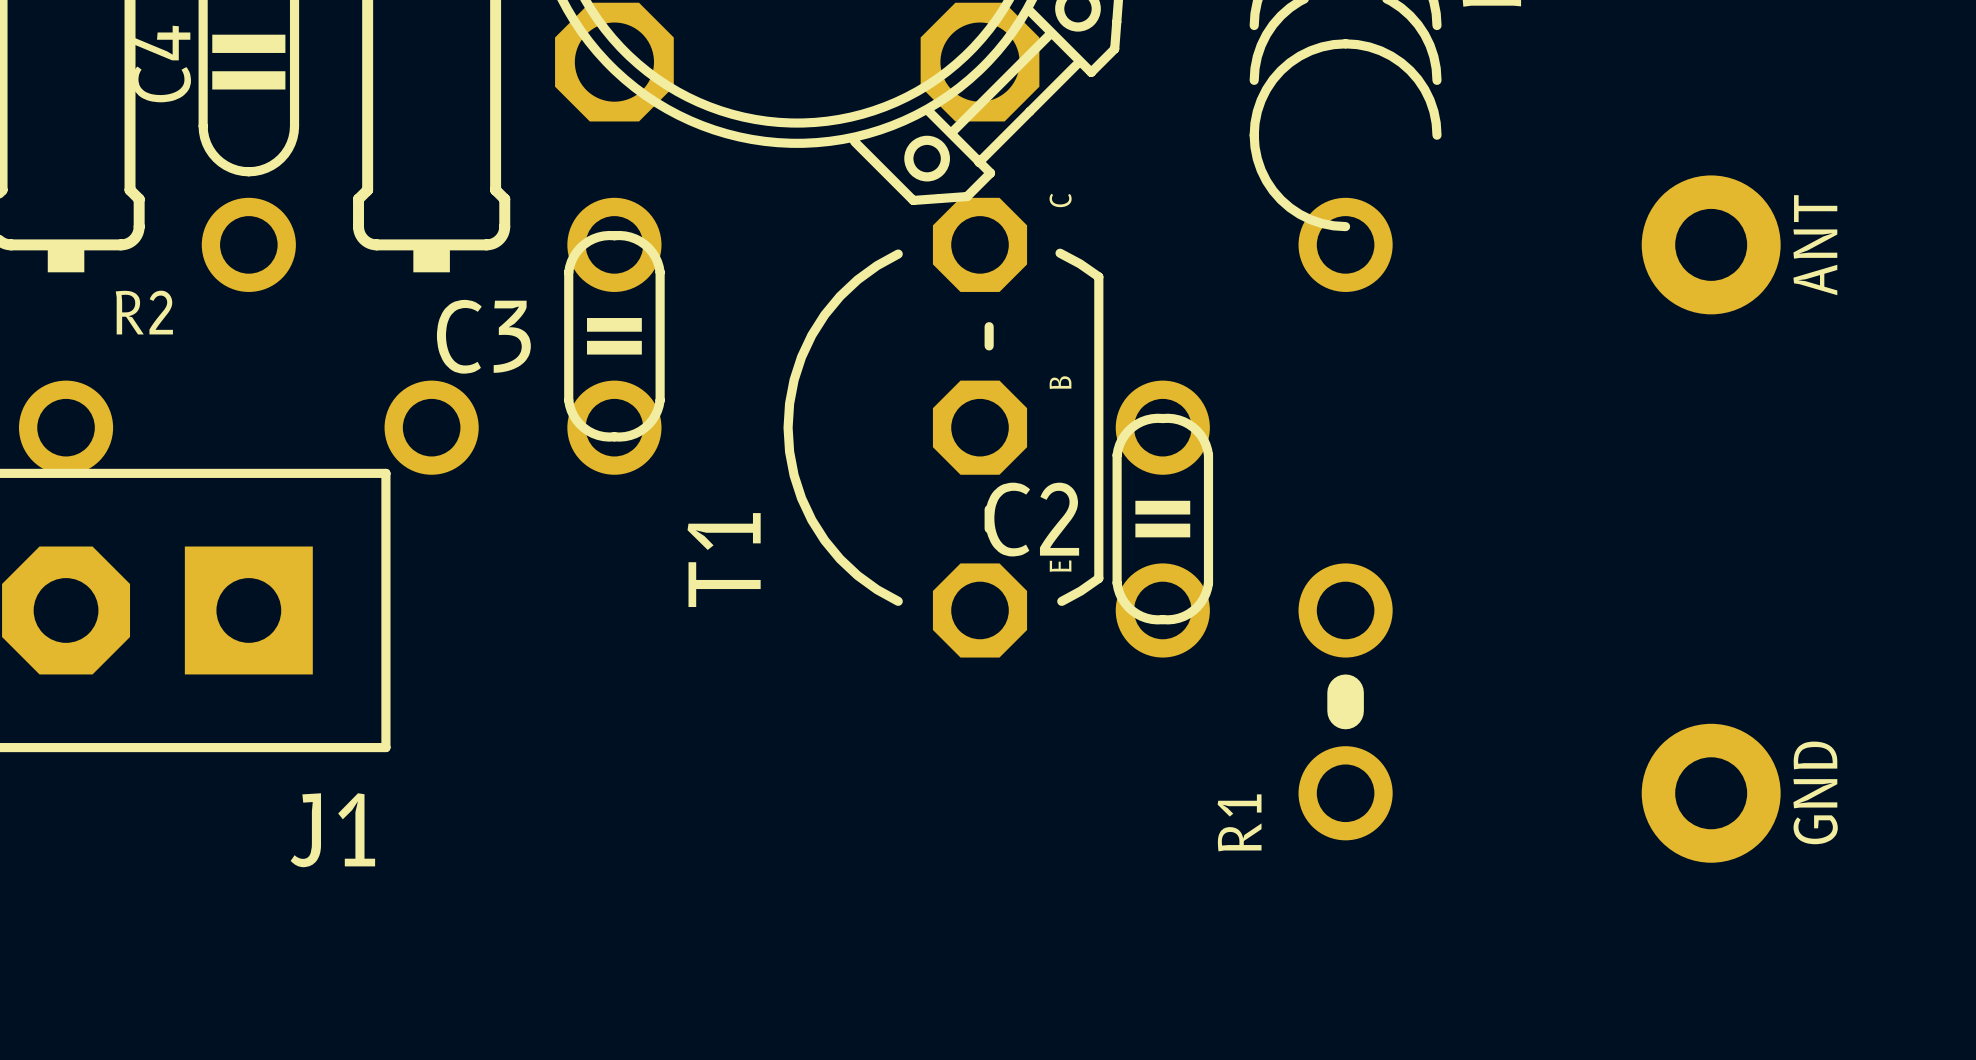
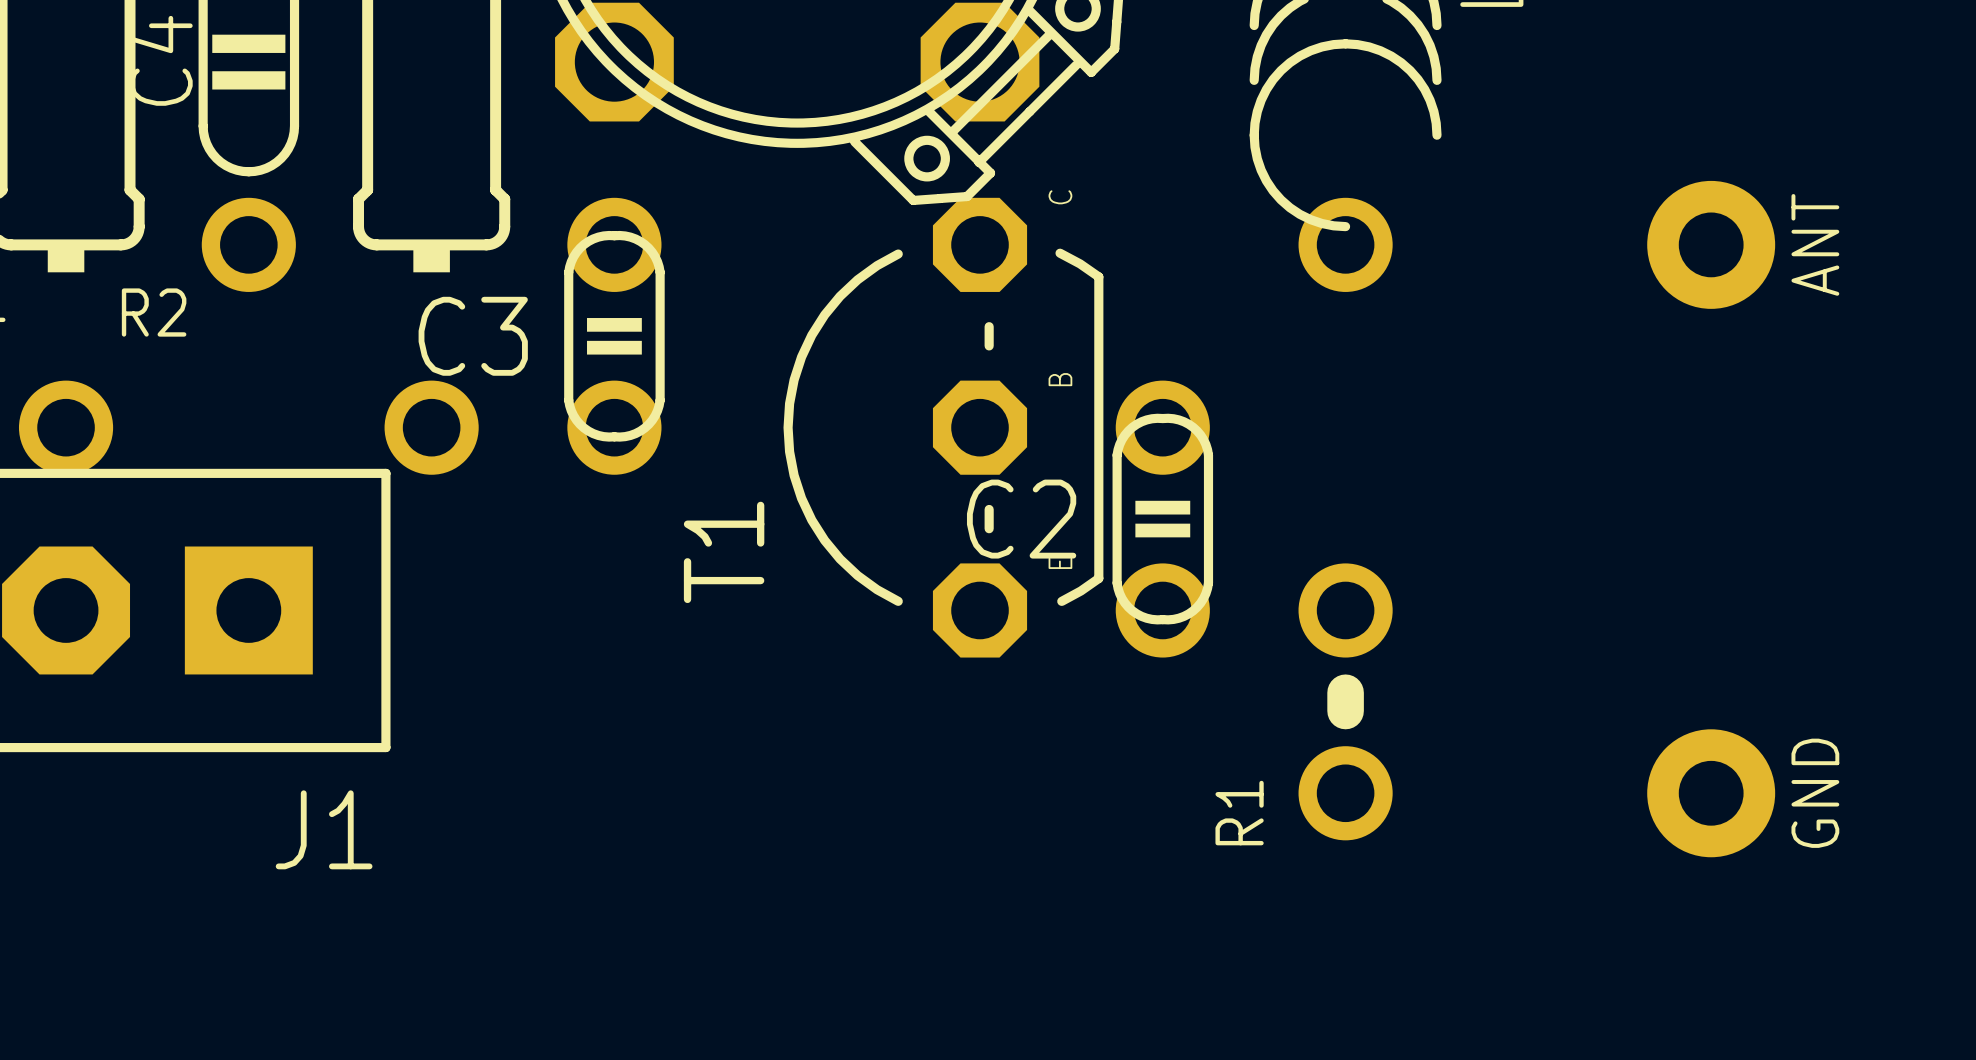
ANT footprint: [1641, 175, 1781, 315] -> [1647, 180, 1776, 309]
GND footprint: [1641, 723, 1781, 863] -> [1647, 729, 1776, 858]

